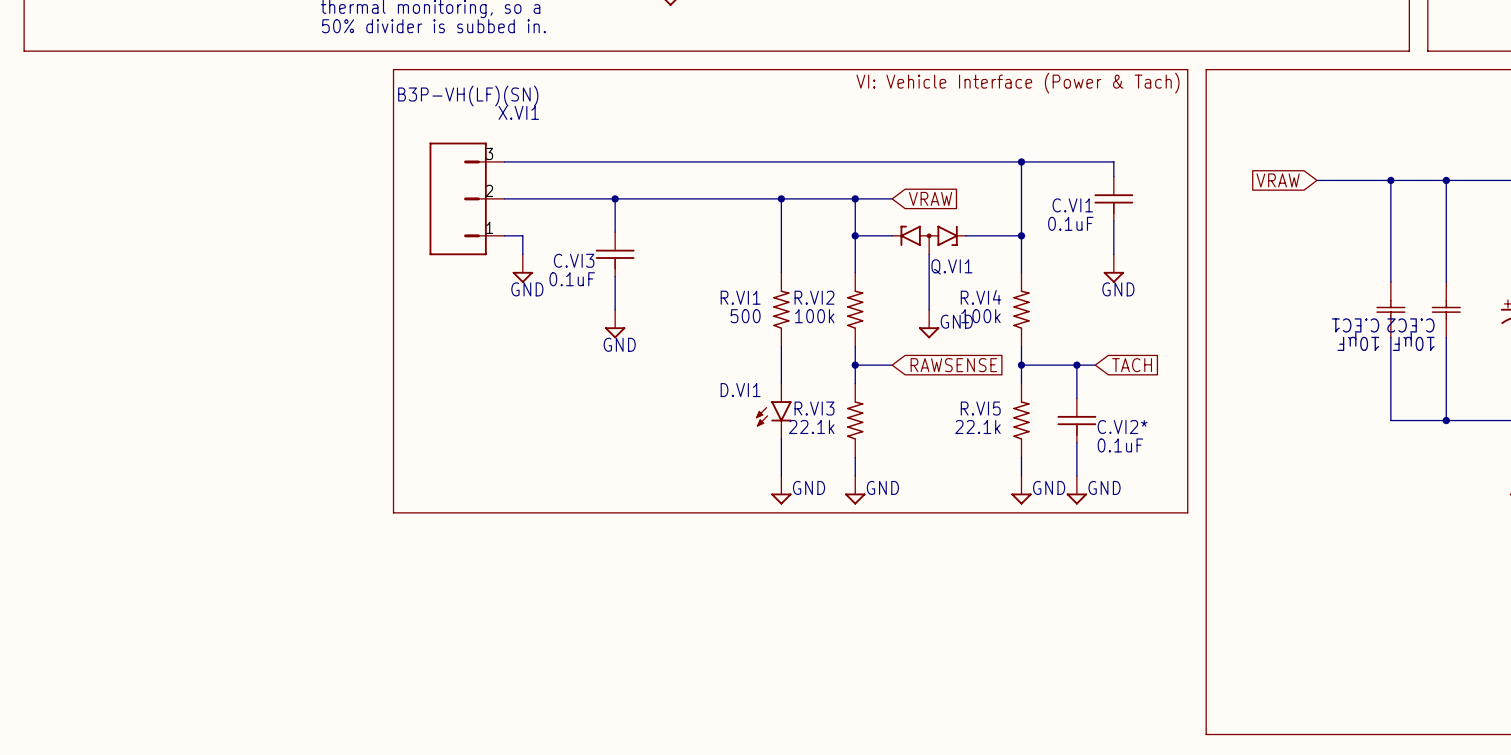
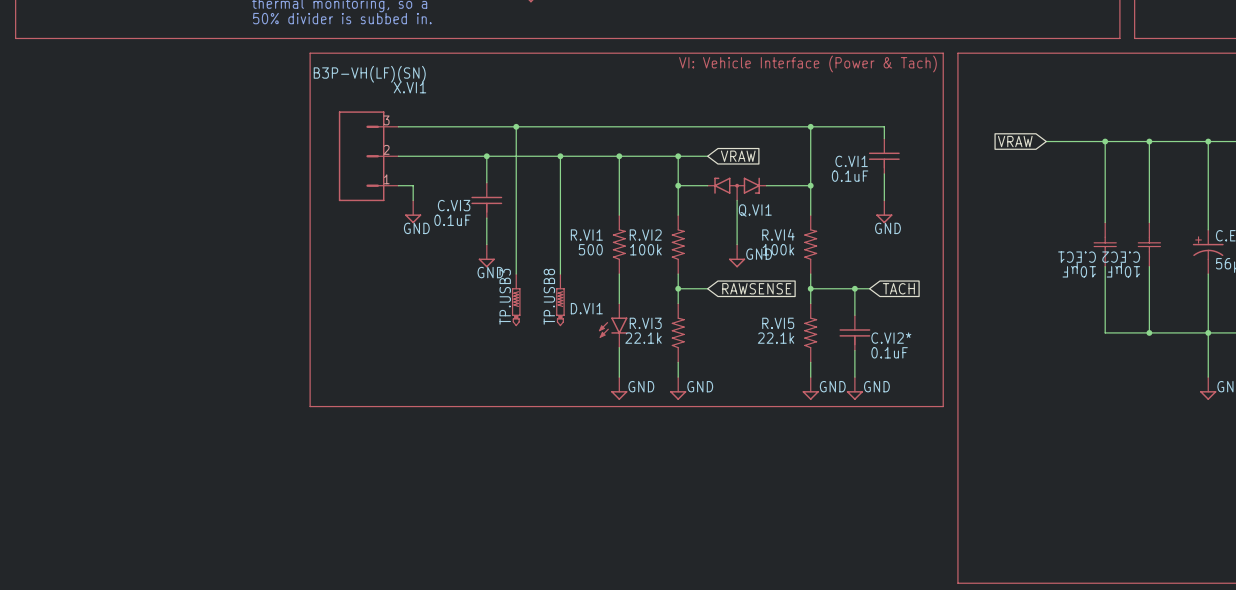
wire: none -> (516, 126) (516, 274)
junction: none -> (516, 126)
wire: none -> (560, 156) (560, 274)
junction: none -> (560, 156)
TP.USB3: none -> (516, 300)
TP.USB8: none -> (560, 300)

